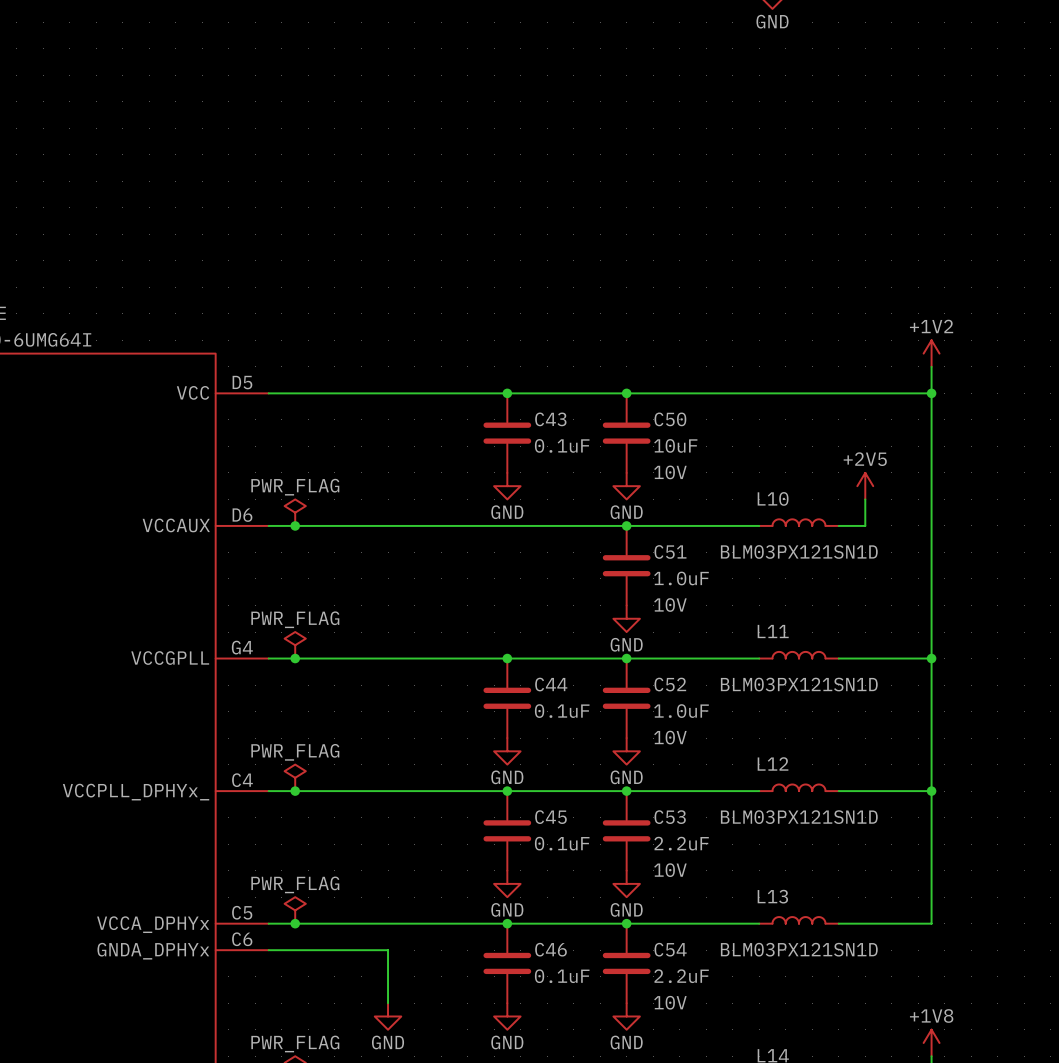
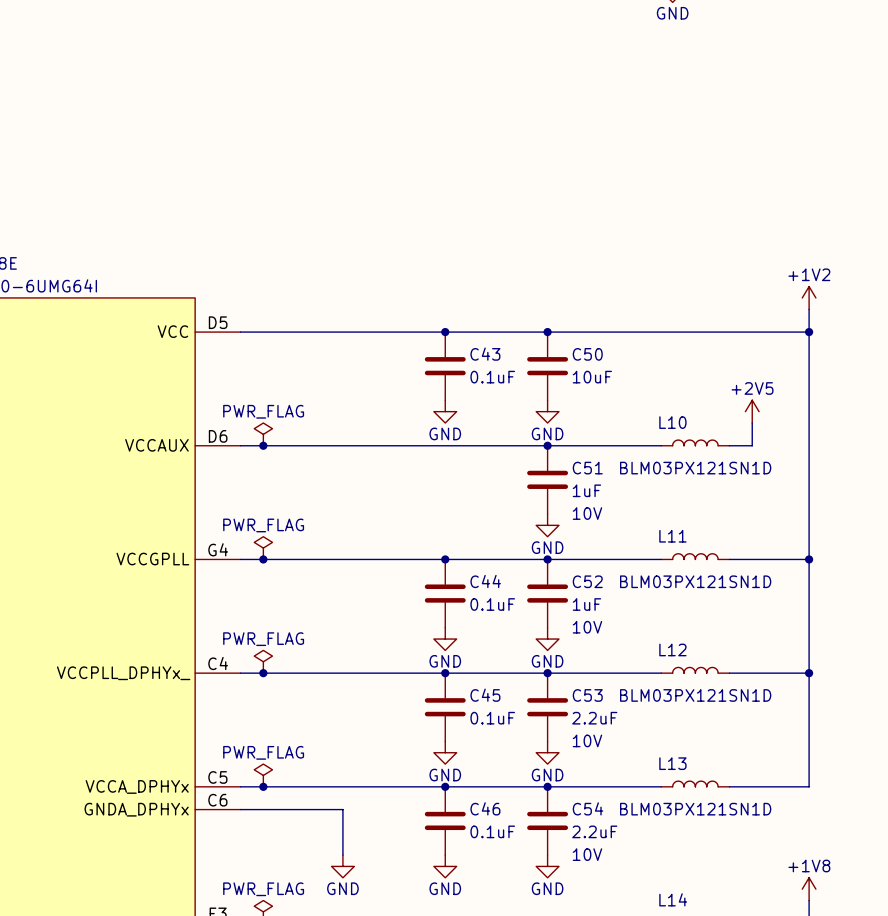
C50 text: 10V (670, 472) -> none
C51 value: 1.0uF (681, 578) -> 1uF (586, 490)
C52 value: 1.0uF (681, 711) -> 1uF (586, 604)

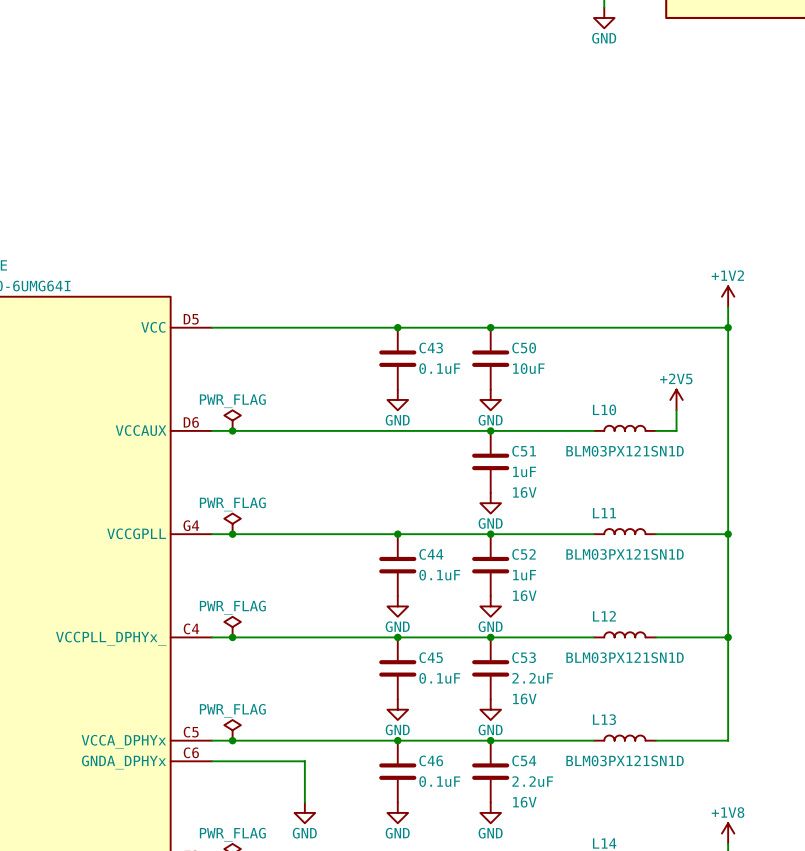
C51 text: 10V (587, 513) -> 16V (524, 492)
C52 text: 10V (587, 627) -> 16V (524, 595)
C53 text: 10V (587, 740) -> 16V (524, 698)
C54 text: 10V (587, 854) -> 16V (524, 802)

